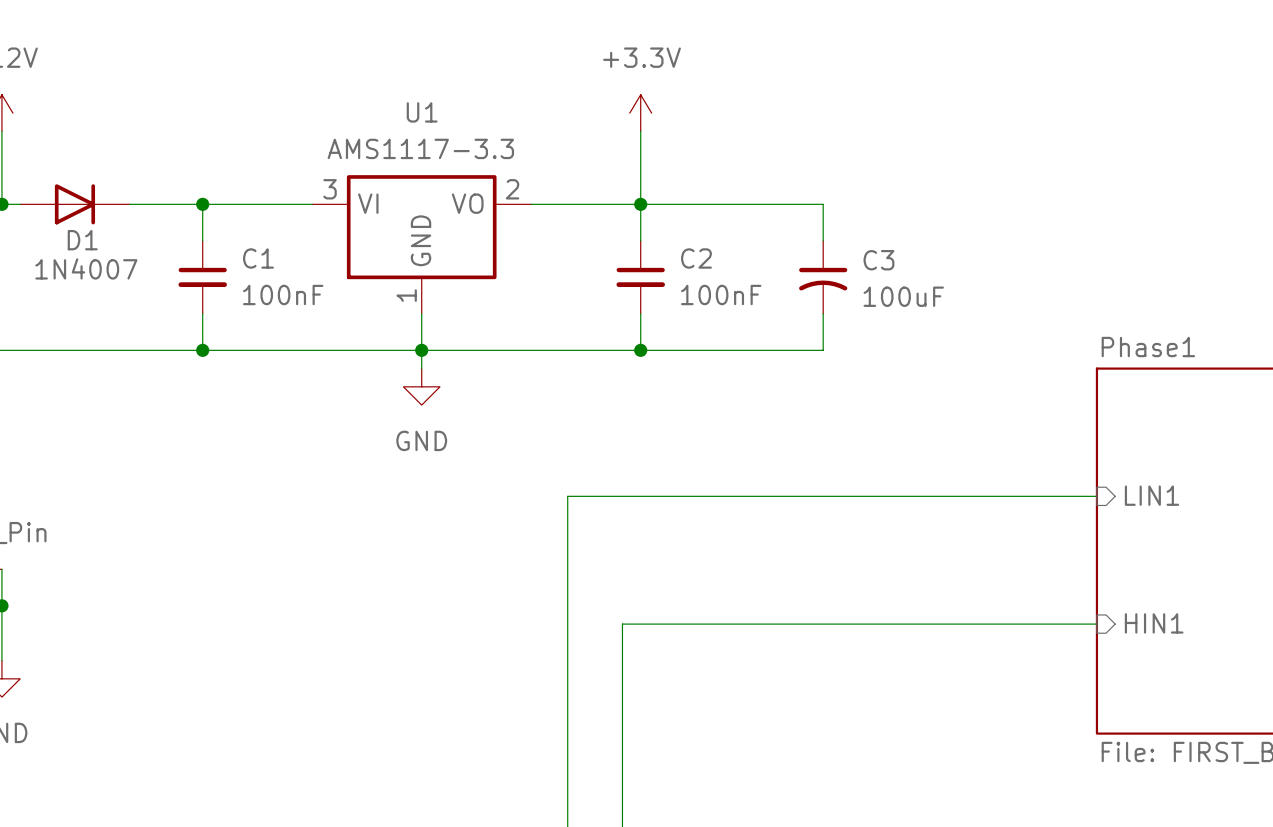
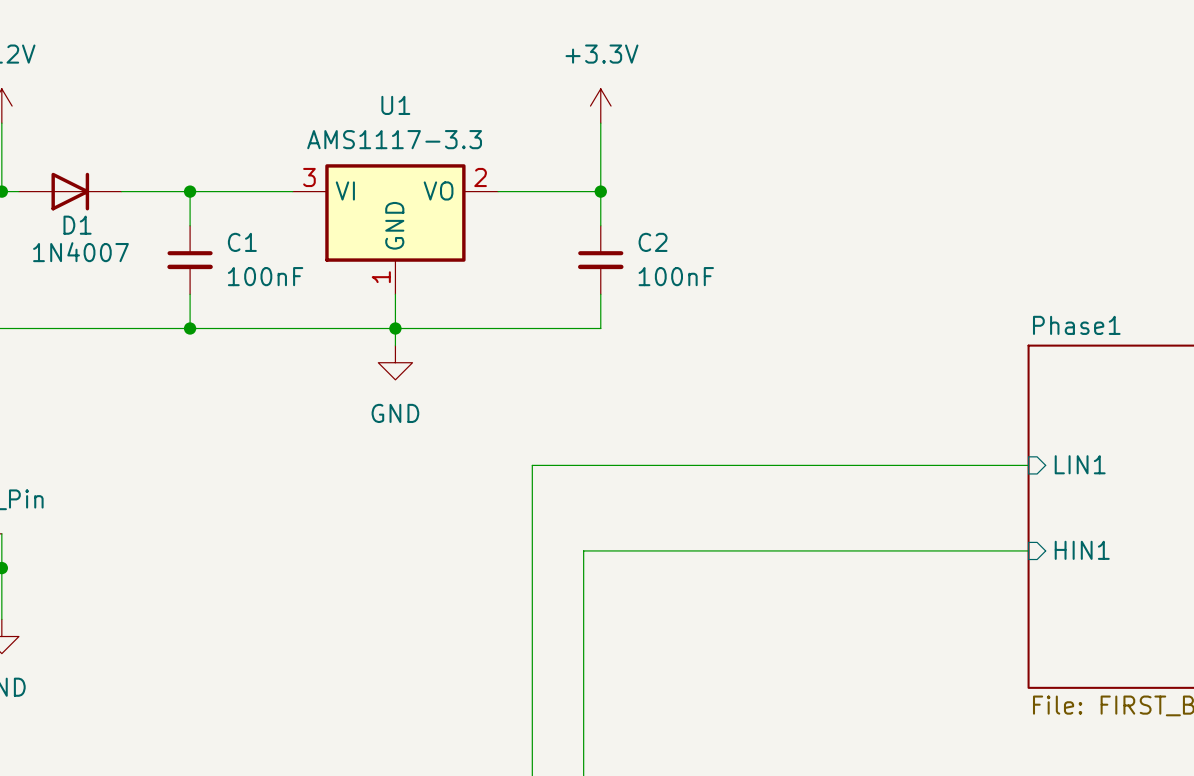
wire: (640, 204) (823, 204) (823, 240) -> none
C3: 100uF (823, 277) -> none
wire: (823, 313) (823, 350) (640, 350) -> none
junction: (640, 350) -> none
sheet pin position: HIN1 (1154, 623) -> HIN1 (1082, 550)
wire: (622, 624) (1096, 624) -> (583, 585) (583, 550) (1028, 550)

